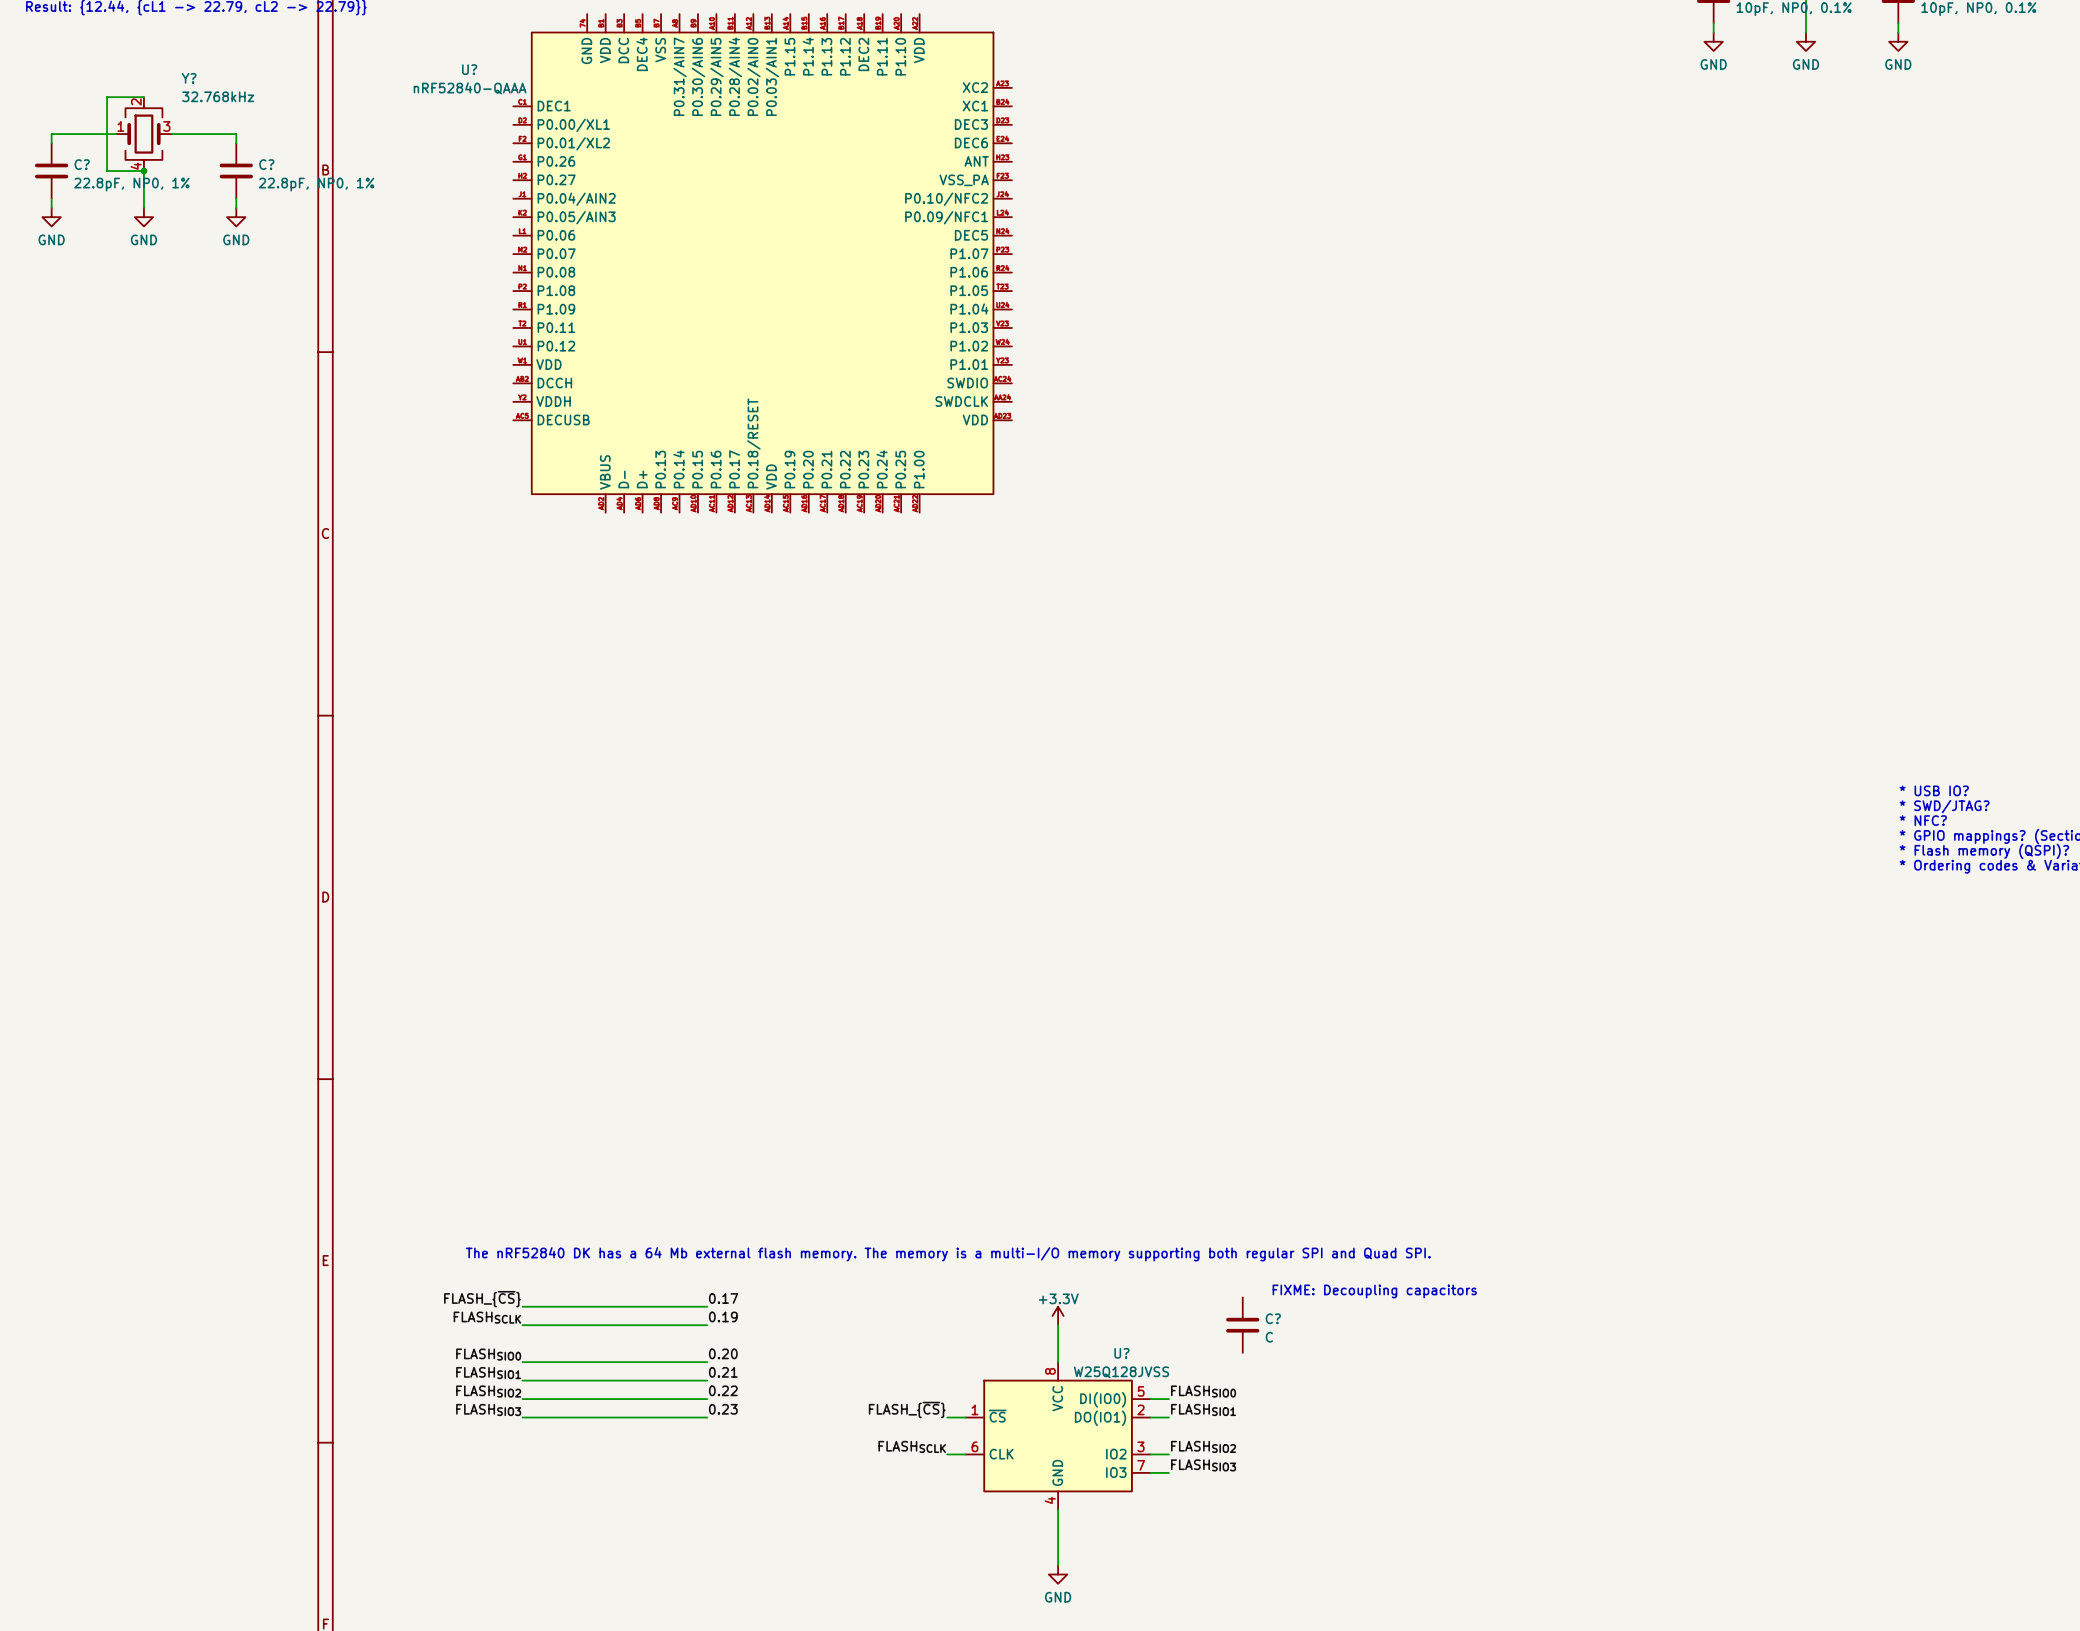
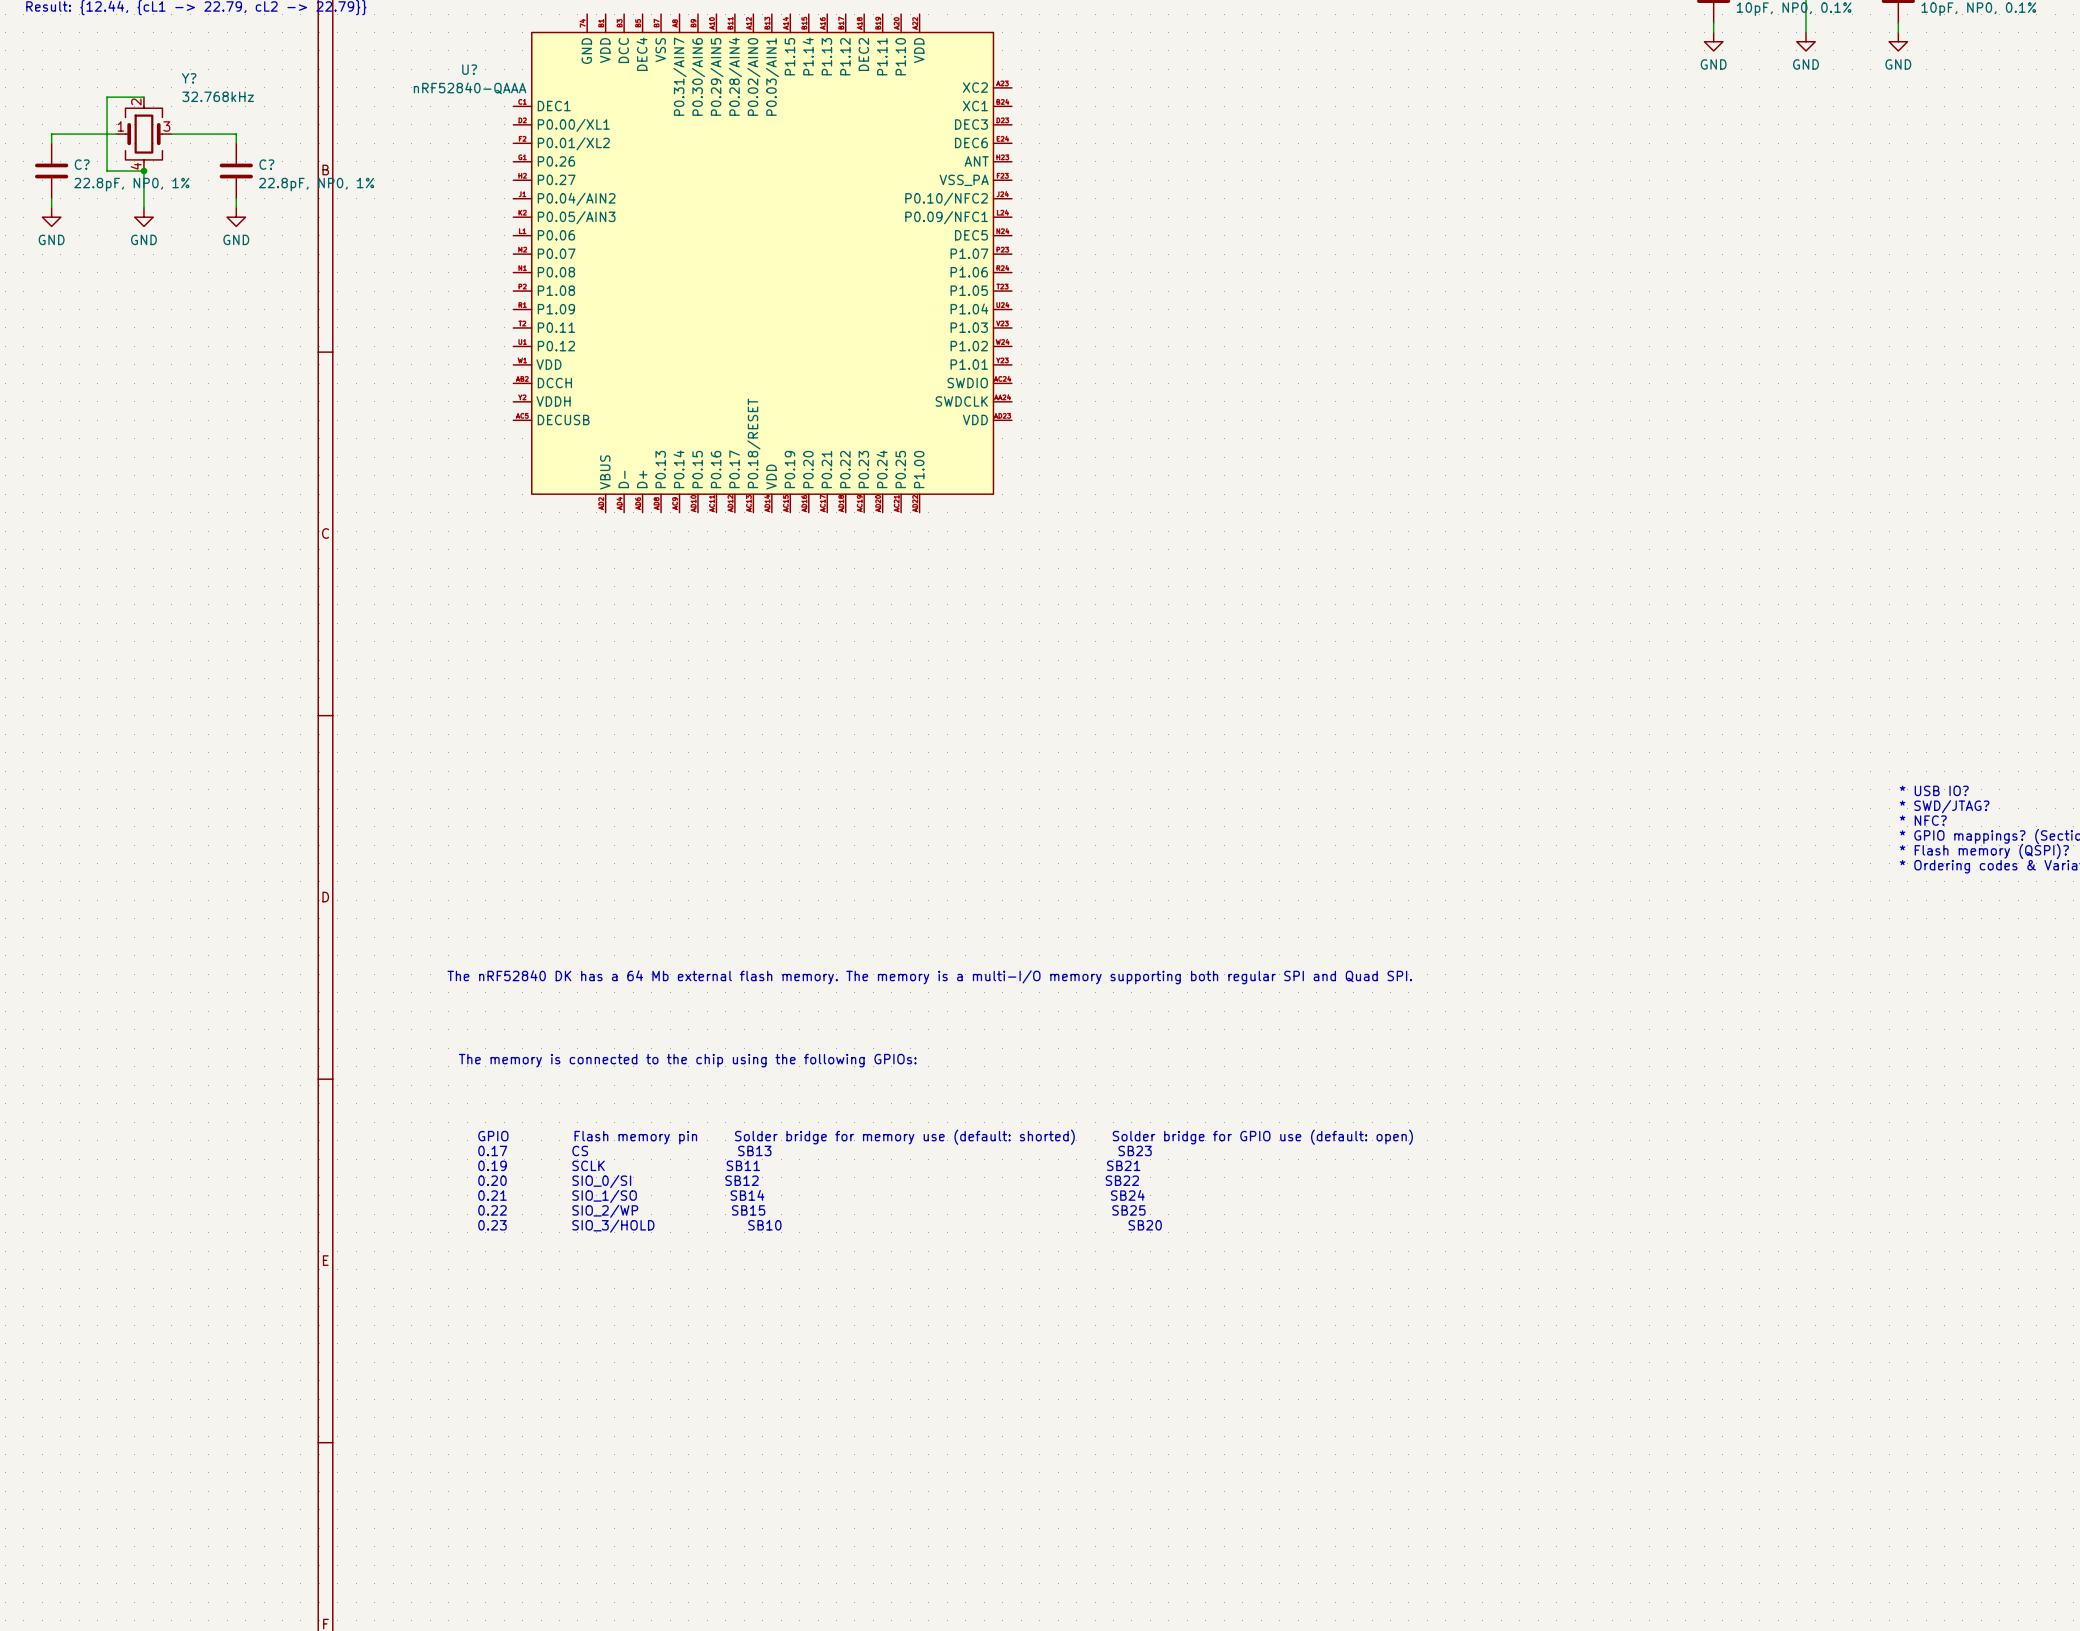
text: none -> The nRF52840 DK has a 64 Mb external flash memory. The memory is a multi-I/O memory supporting both regular SPI and Quad SPI. (929, 977)
text: none -> The memory is connected to the chip using the following GPIOs: (687, 1060)
text: none -> GPIO Flash memory pin Solder bridge for memory use (default: shorted) Solder bridge for GPIO use (default: open) (945, 1137)
text: none -> 0.17 CS SB13 SB23 (815, 1150)
text: none -> 0.19 SCLK SB11 SB21 (809, 1165)
text: none -> 0.20 SIO_0/SI SB12 SB22 (808, 1181)
text: none -> 0.21 SIO_1/SO SB14 SB24 (811, 1196)
text: none -> 0.22 SIO_2/WP SB15 SB25 (811, 1211)
text: none -> 0.23 SIO_3/HOLD SB10 SB20 (820, 1226)
text: The nRF52840 DK has a 64 Mb external flash memory. The memory is a multi-I/O memory supporting both regular SPI and Quad SPI. (948, 1254) -> none
text: FIXME: Decoupling capacitors (1374, 1291) -> none
label: 0.17 (723, 1298) -> none
label: FLASH_{~{CS}} (482, 1299) -> none
wire: (522, 1306) (707, 1306) -> none
power symbol: +3.3V (1058, 1315) -> none
label: 0.19 (723, 1316) -> none
label: FLASHSCLK (487, 1317) -> none
wire: (522, 1325) (707, 1325) -> none
wire: (1058, 1325) (1058, 1362) -> none
C?: C (1242, 1325) -> none
label: 0.20 (723, 1353) -> none
label: FLASHSIO0 (488, 1354) -> none
wire: (522, 1362) (707, 1362) -> none
label: 0.21 (723, 1372) -> none
label: FLASHSIO1 (488, 1373) -> none
wire: (522, 1380) (707, 1380) -> none
label: 0.22 (723, 1390) -> none
label: FLASHSIO2 (488, 1391) -> none
label: FLASHSIO0 (1203, 1391) -> none
wire: (522, 1399) (707, 1399) -> none
wire: (1150, 1399) (1168, 1399) -> none
label: FLASHSIO3 (488, 1409) -> none
label: 0.23 (723, 1409) -> none
label: FLASH_{~{CS}} (907, 1409) -> none
label: FLASHSIO1 (1203, 1409) -> none
wire: (522, 1417) (707, 1417) -> none
wire: (947, 1417) (965, 1417) -> none
wire: (1150, 1417) (1168, 1417) -> none
U?: W25Q128JVSS (1058, 1436) -> none
label: FLASHSCLK (912, 1446) -> none
label: FLASHSIO2 (1203, 1446) -> none
wire: (947, 1454) (965, 1454) -> none
wire: (1150, 1454) (1168, 1454) -> none
label: FLASHSIO3 (1203, 1465) -> none
wire: (1150, 1472) (1168, 1472) -> none
wire: (1058, 1509) (1058, 1565) -> none
power symbol: GND (1058, 1574) -> none

